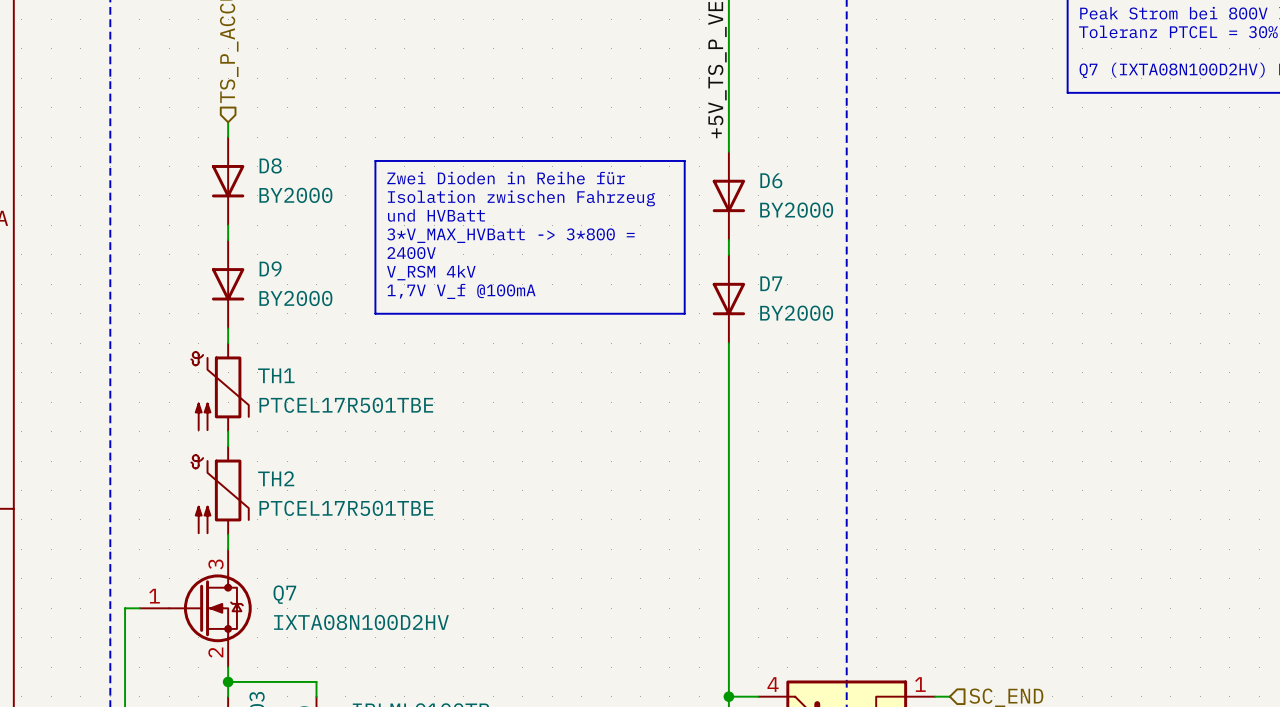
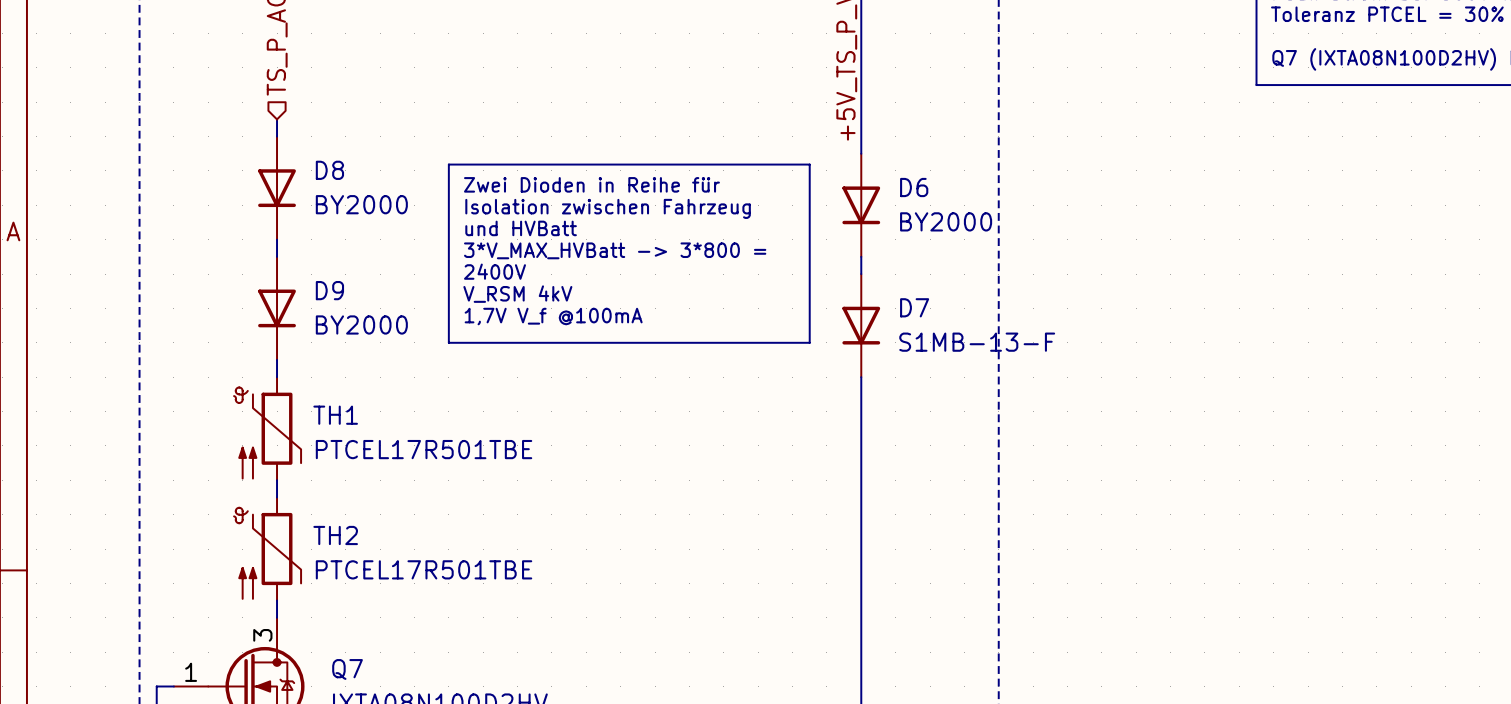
D7 value: BY2000 (796, 313) -> S1MB-13-F (977, 342)

